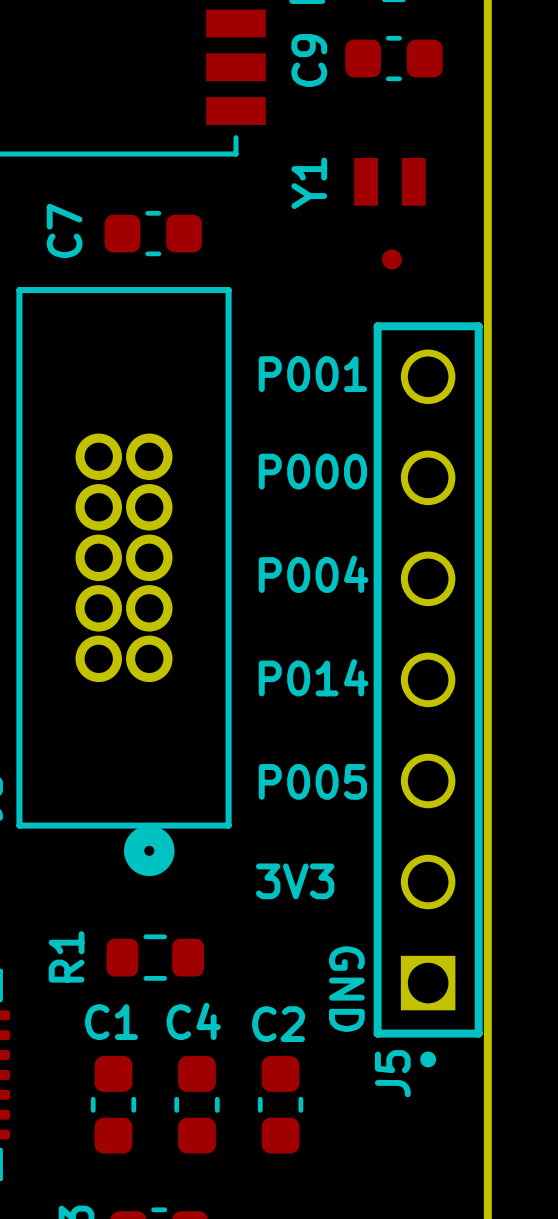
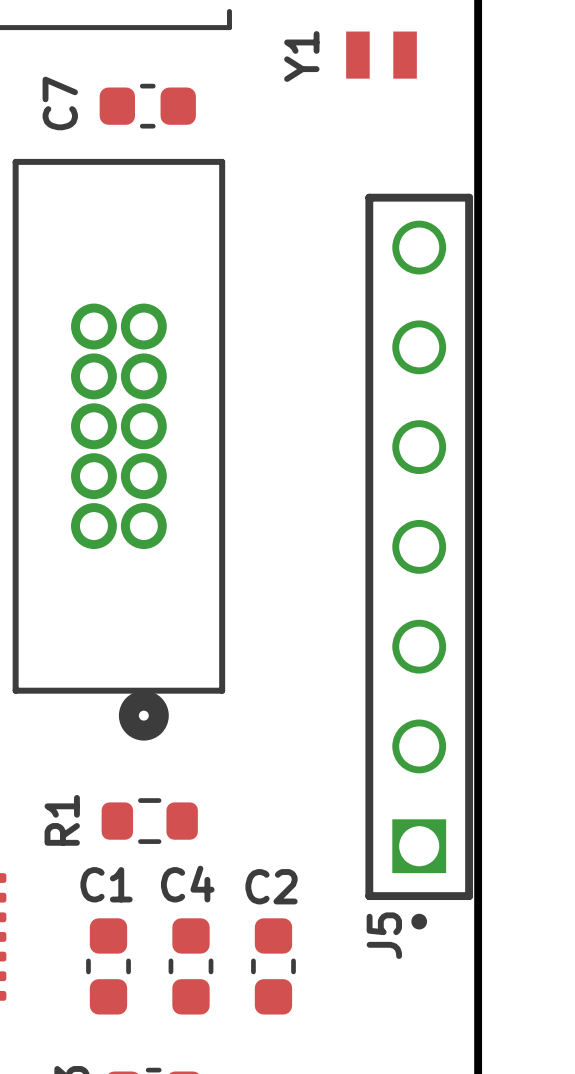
part: (391, 259) -> none
text: P001 (312, 374) -> none
text: P000 (312, 471) -> none
text: P004 (313, 574) -> none
text: P014 (313, 677) -> none
text: P005 (312, 781) -> none
text: 3V3 (295, 881) -> none
text: GND (346, 989) -> none

